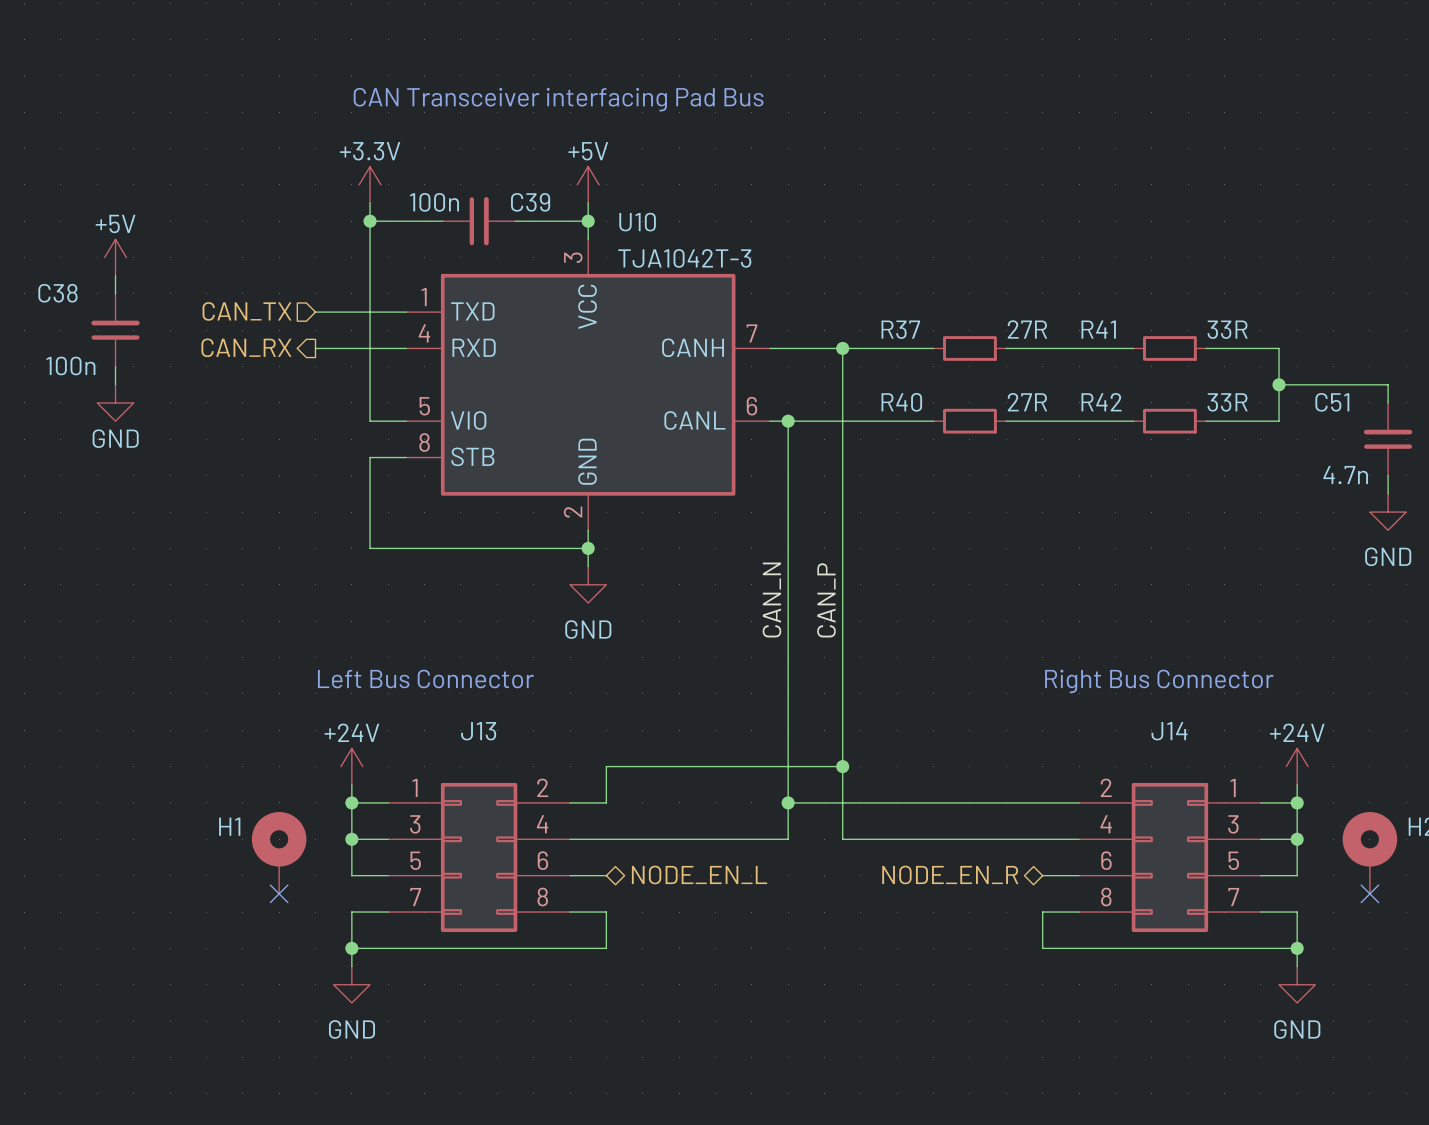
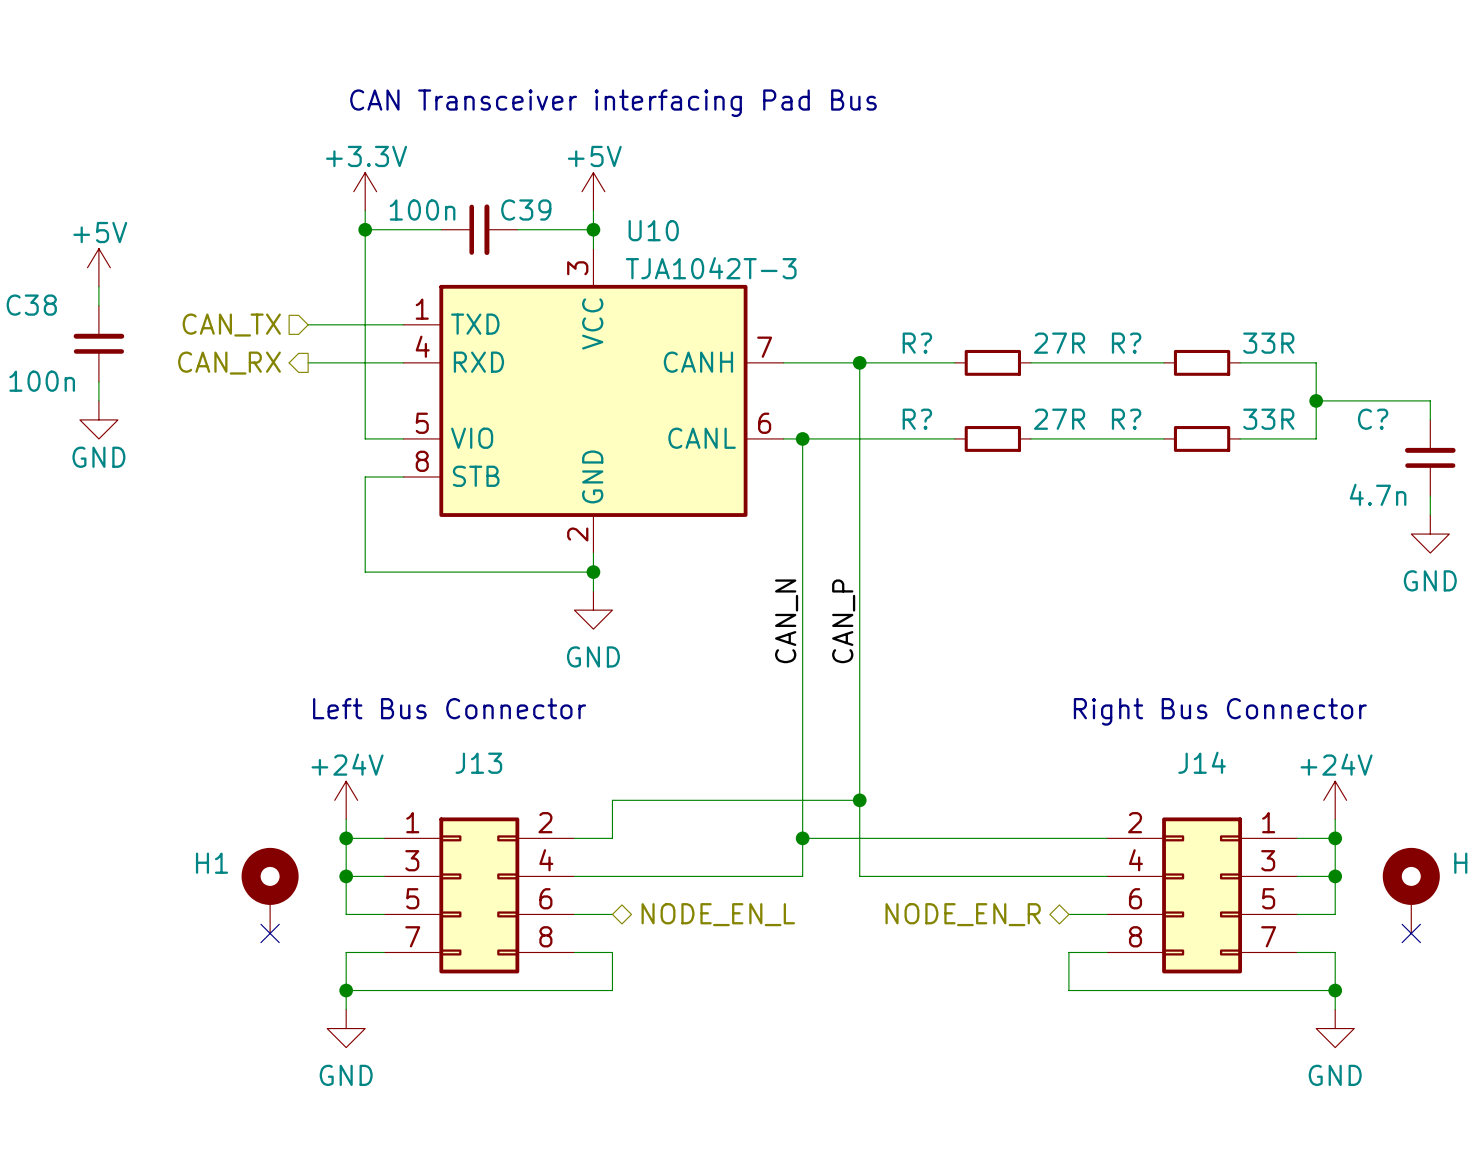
R37 name: R37 (900, 329) -> R? (917, 343)
R41 name: R41 (1098, 329) -> R? (1126, 343)
R40 name: R40 (901, 402) -> R? (917, 419)
R42 name: R42 (1101, 402) -> R? (1126, 419)
C51 name: C51 (1332, 402) -> C? (1373, 419)

